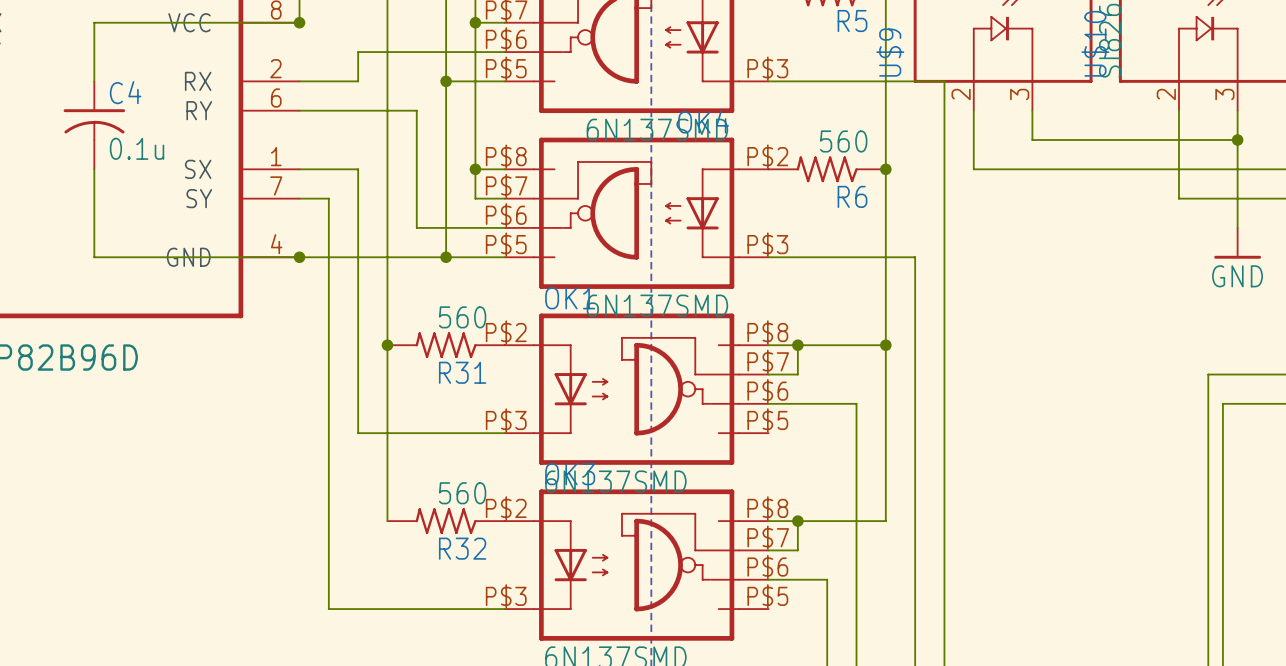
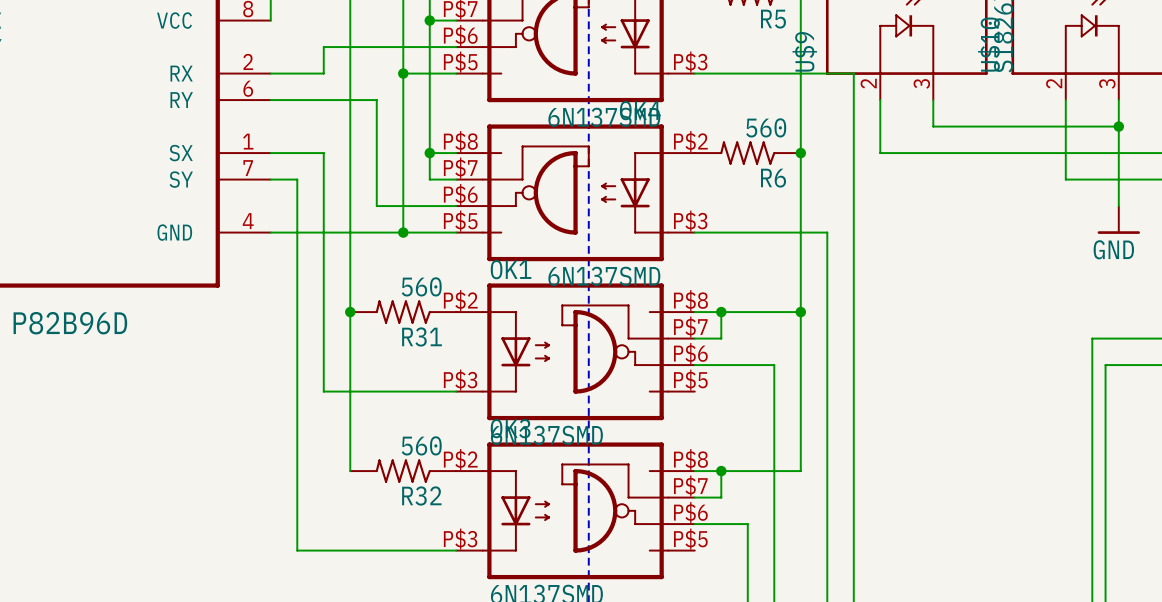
wire: (299, 22) (94, 22) (94, 81) -> none
junction: (299, 22) -> none
C4: 0.1u (94, 125) -> none
wire: (94, 169) (94, 257) (299, 257) -> none
junction: (299, 257) -> none

